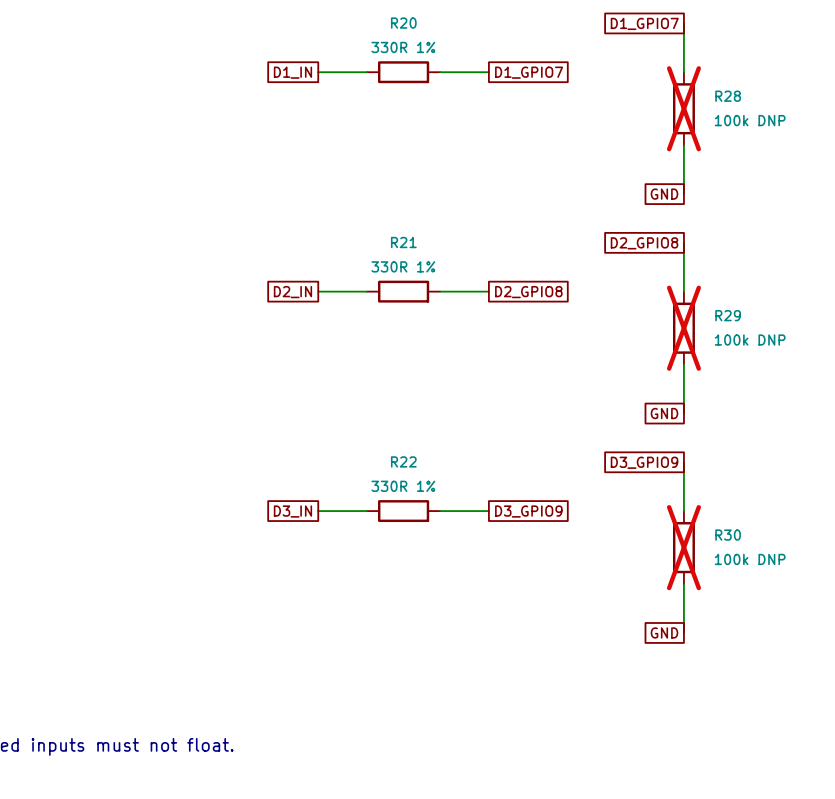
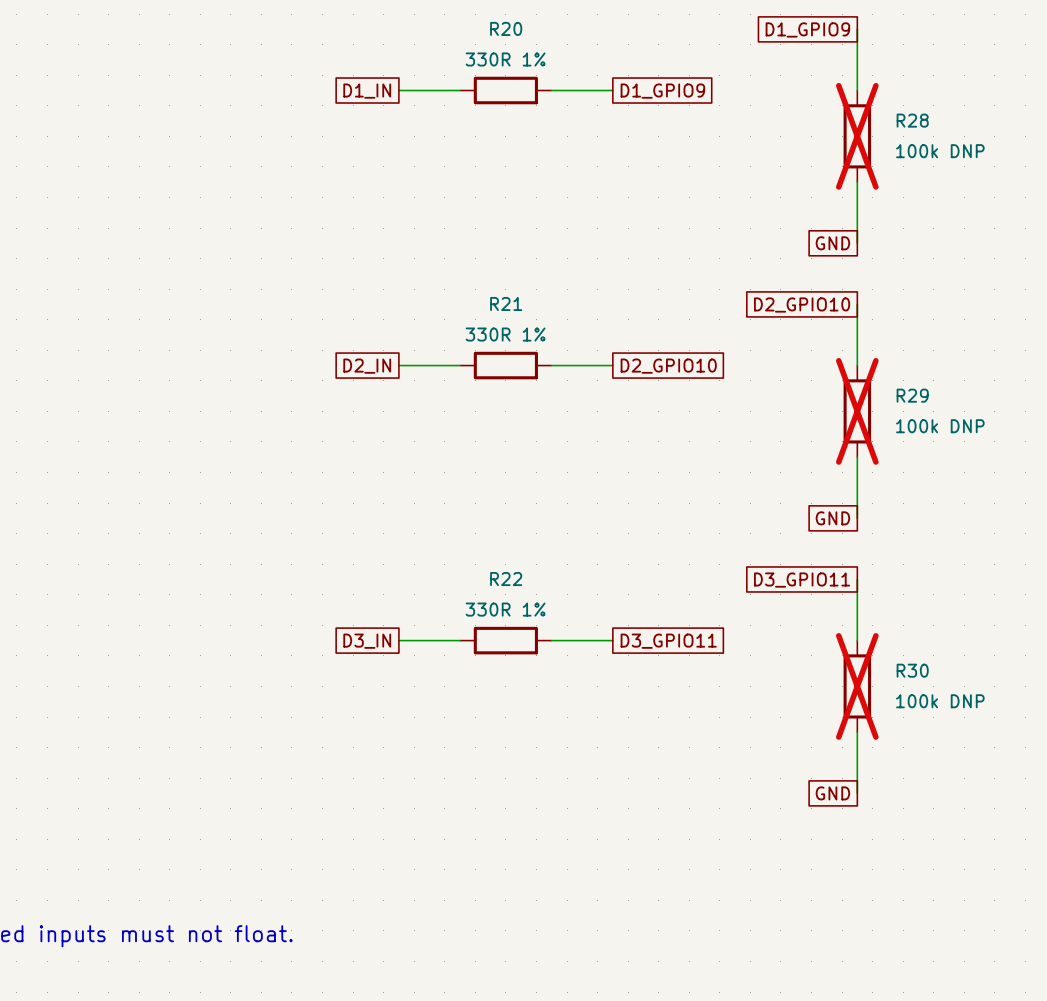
global label: D1_GPIO7 (644, 23) -> D1_GPIO9 (807, 29)
global label: D1_GPIO7 (529, 72) -> D1_GPIO9 (662, 91)
global label: D2_GPIO8 (644, 243) -> D2_GPIO10 (802, 305)
global label: D2_GPIO8 (528, 292) -> D2_GPIO10 (668, 366)
global label: D3_GPIO9 (644, 462) -> D3_GPIO11 (802, 580)
global label: D3_GPIO9 (528, 511) -> D3_GPIO11 (668, 641)

